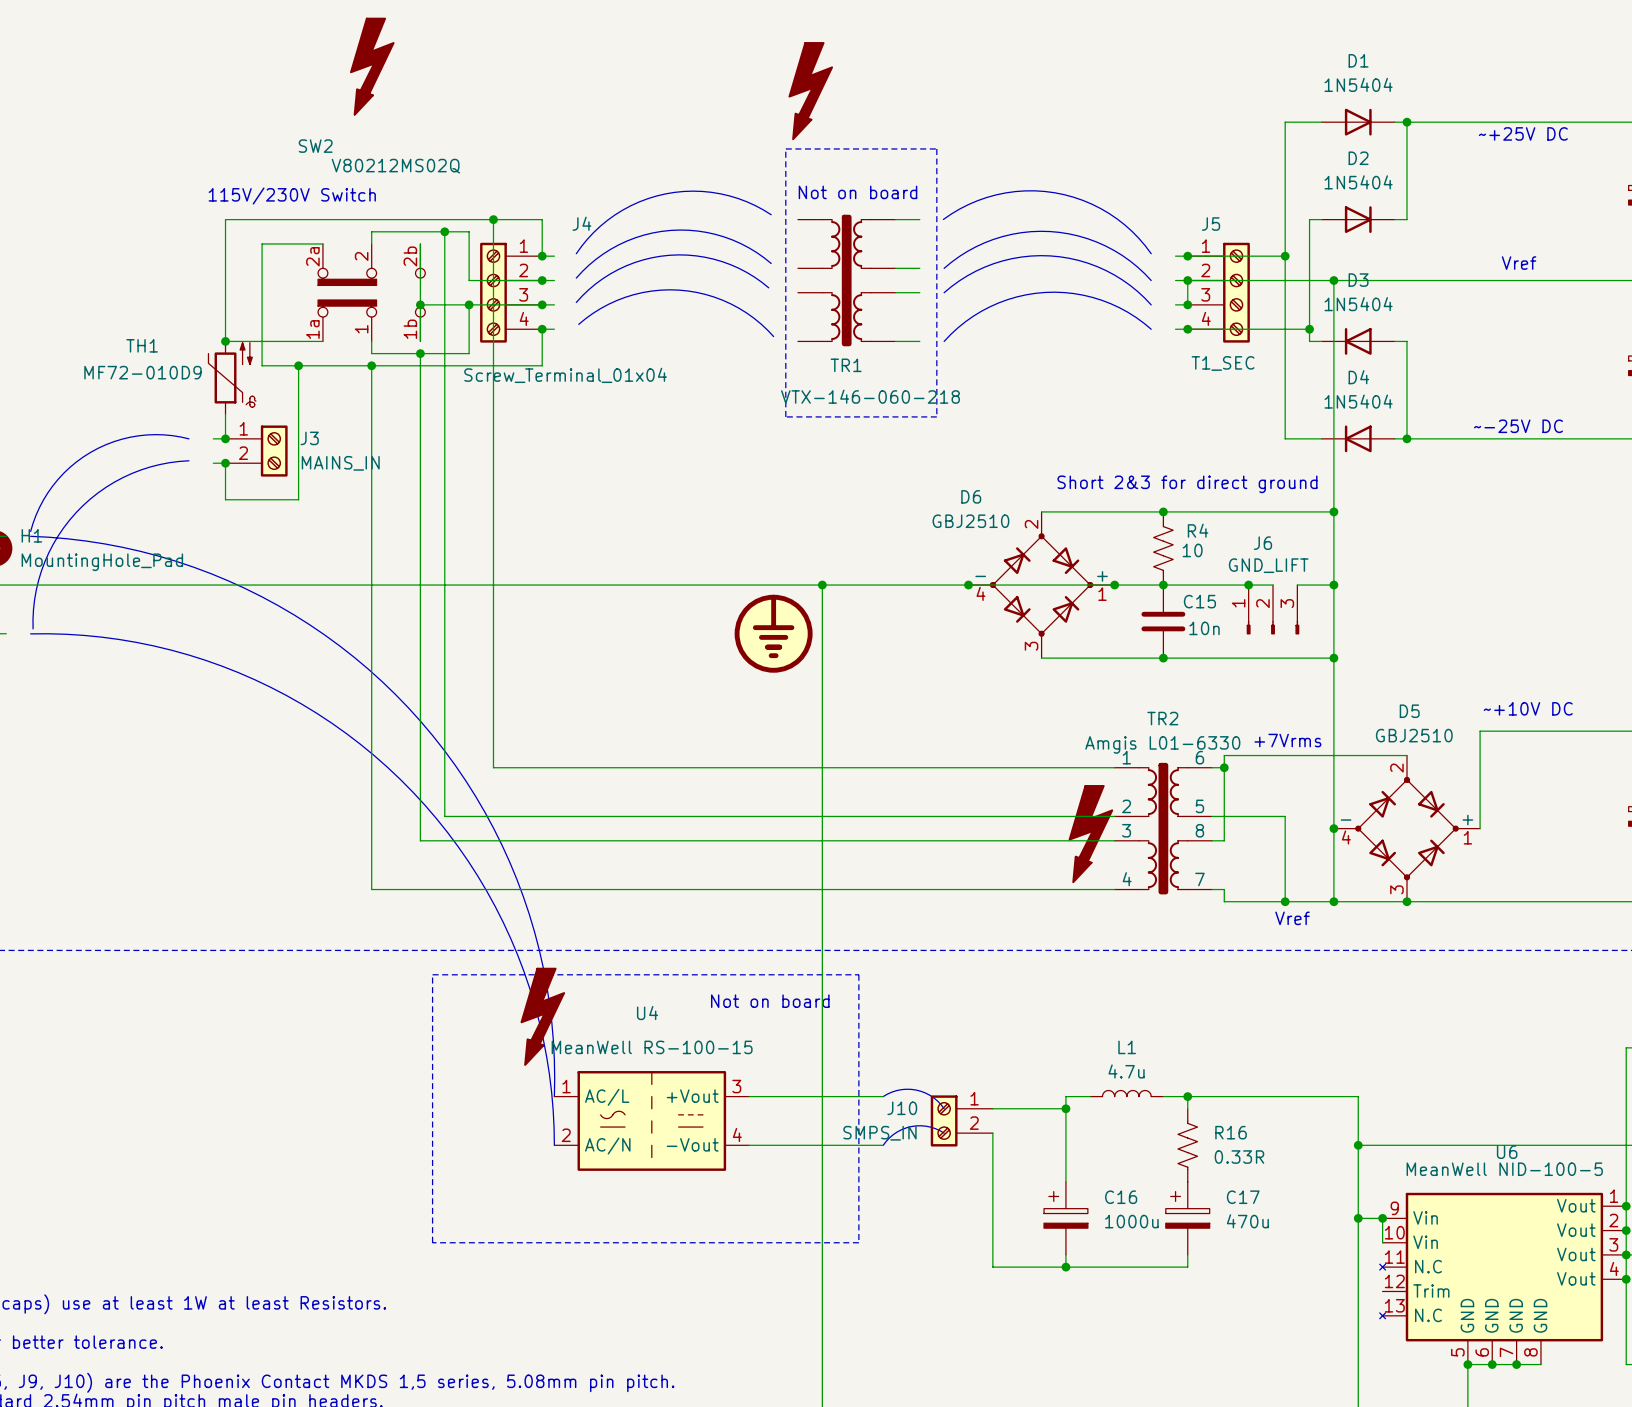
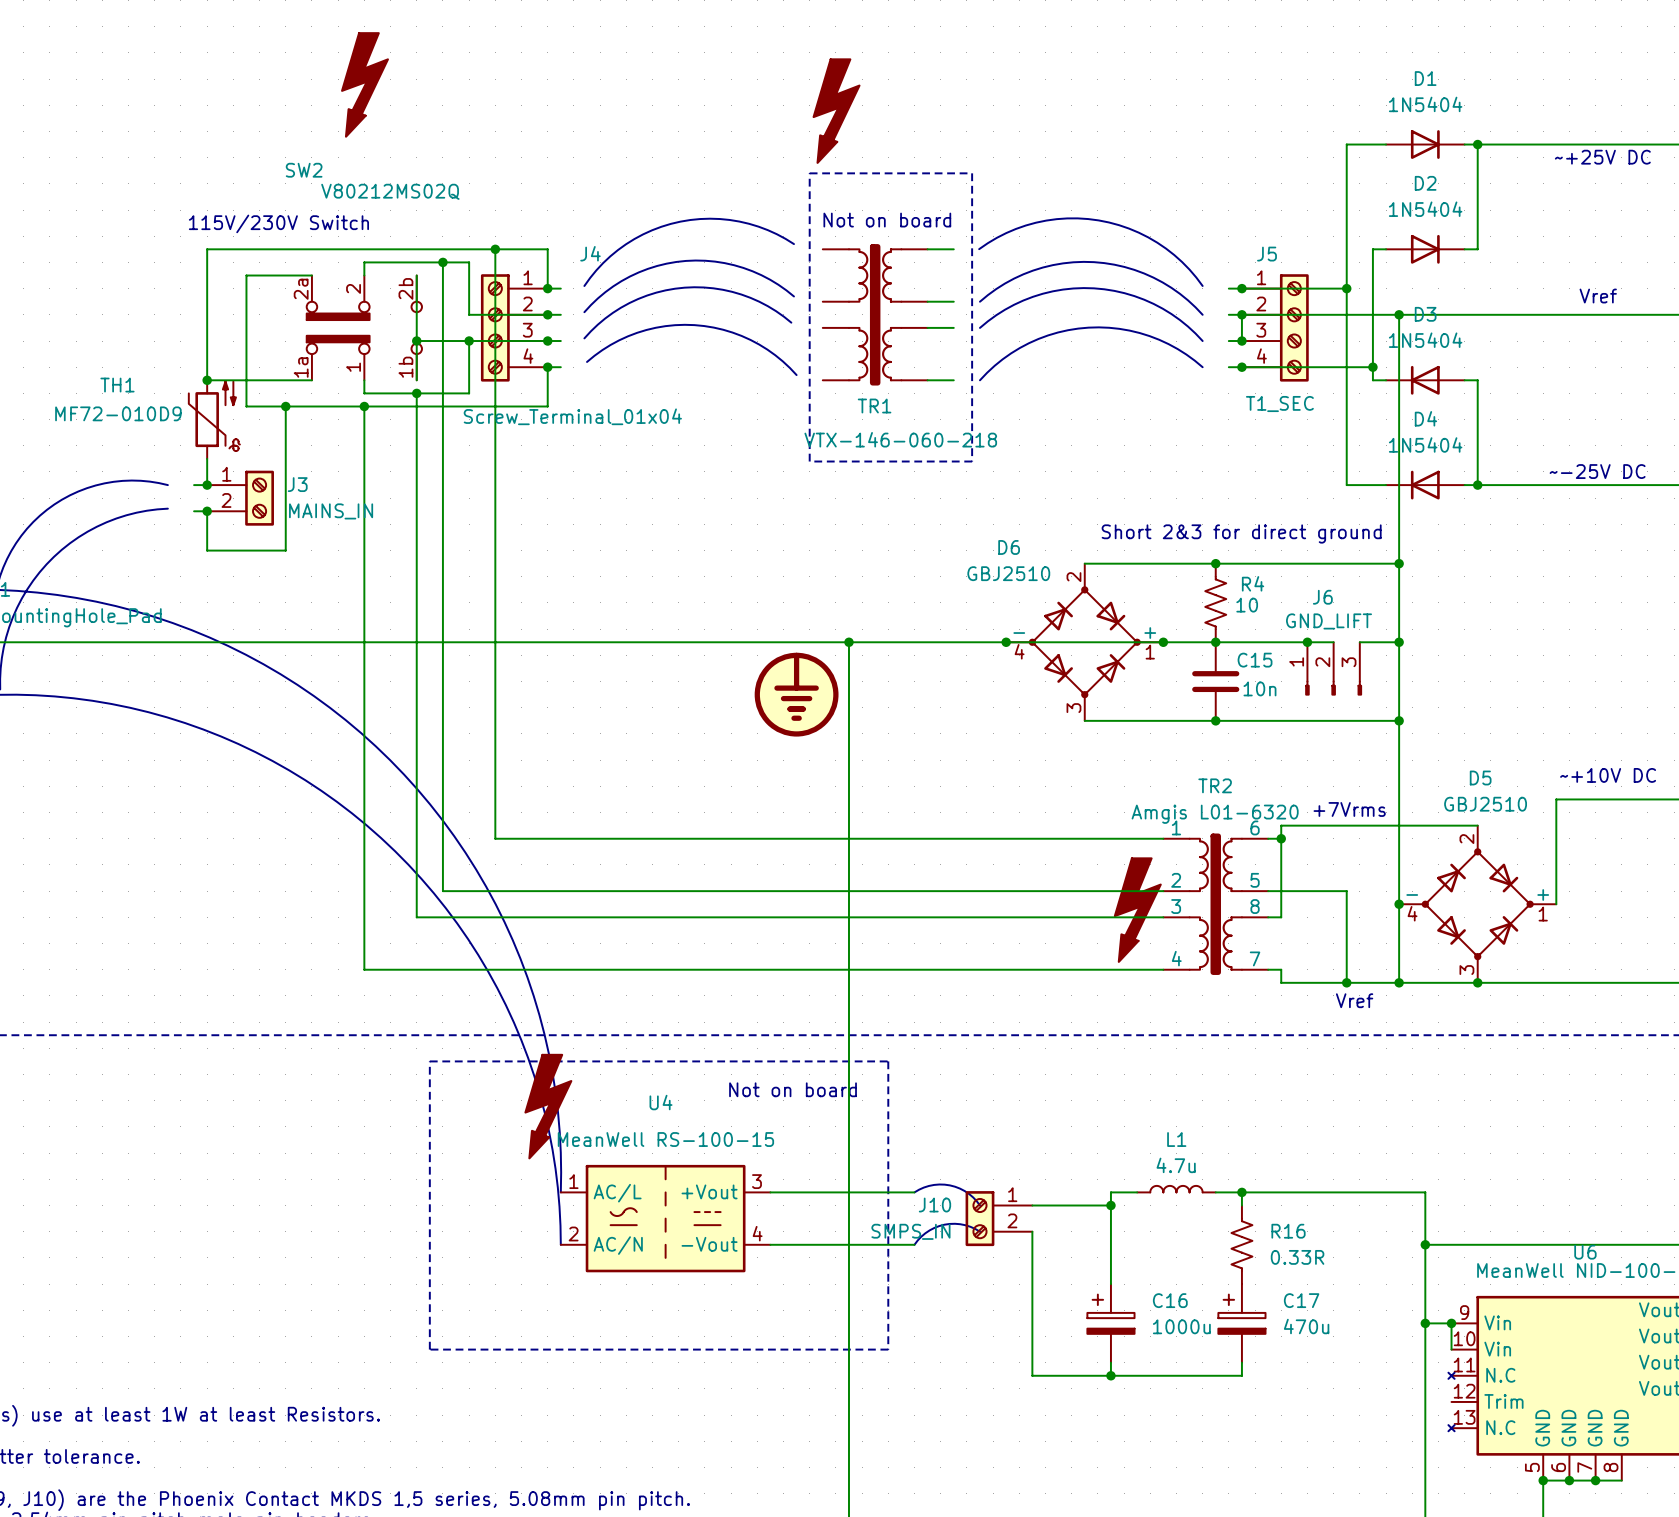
TR2 value: Amgis L01-6330 (1162, 744) -> Amgis L01-6320 (1215, 814)

